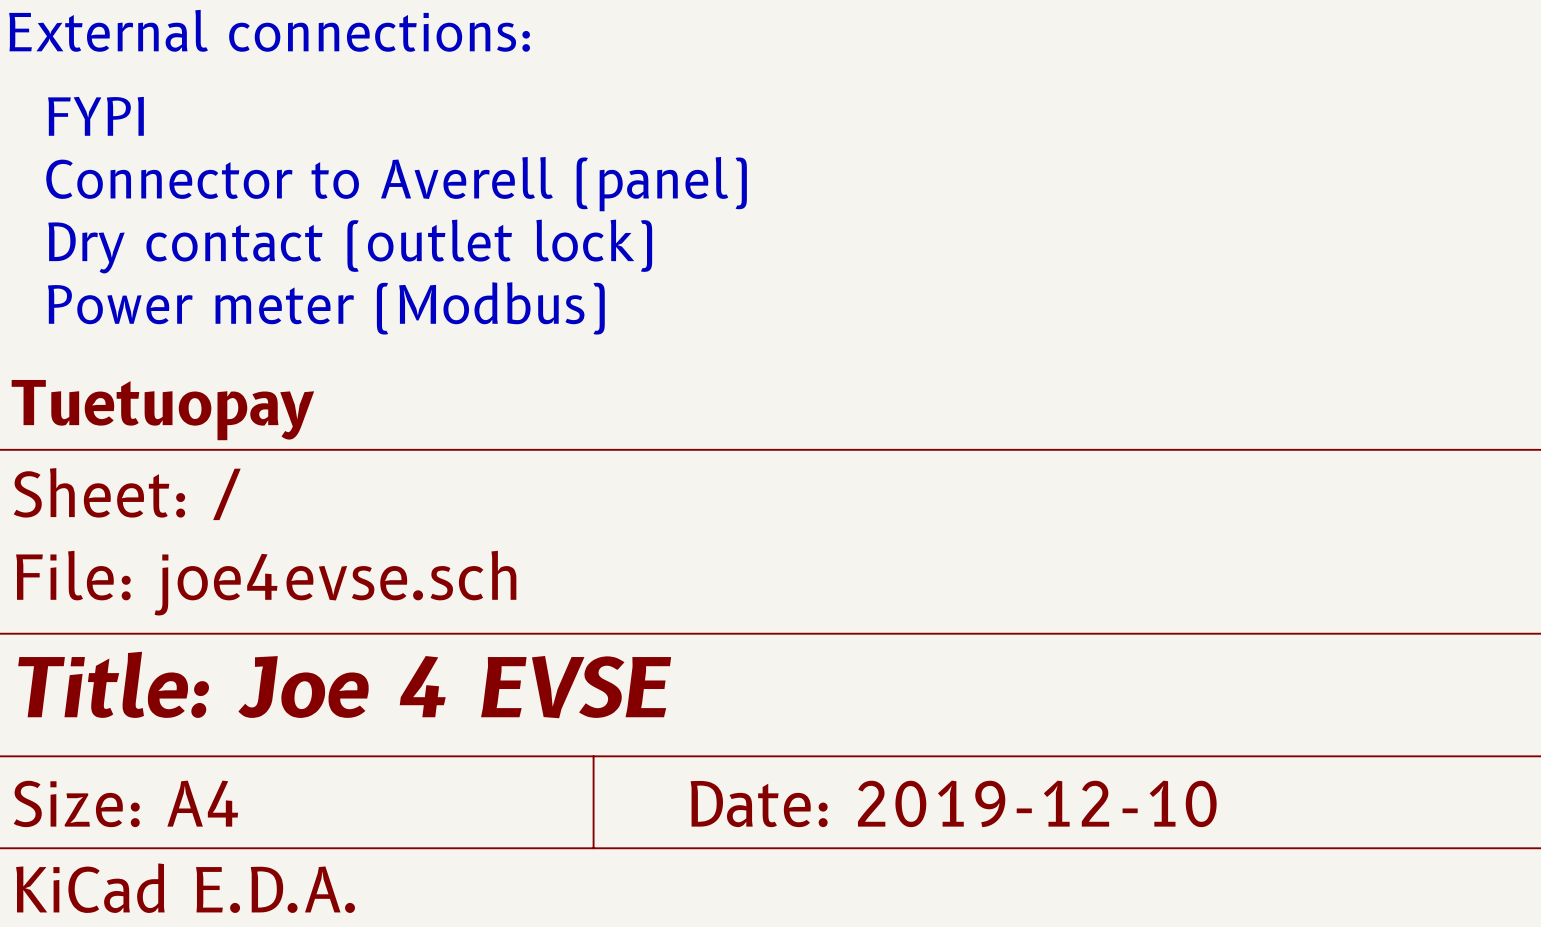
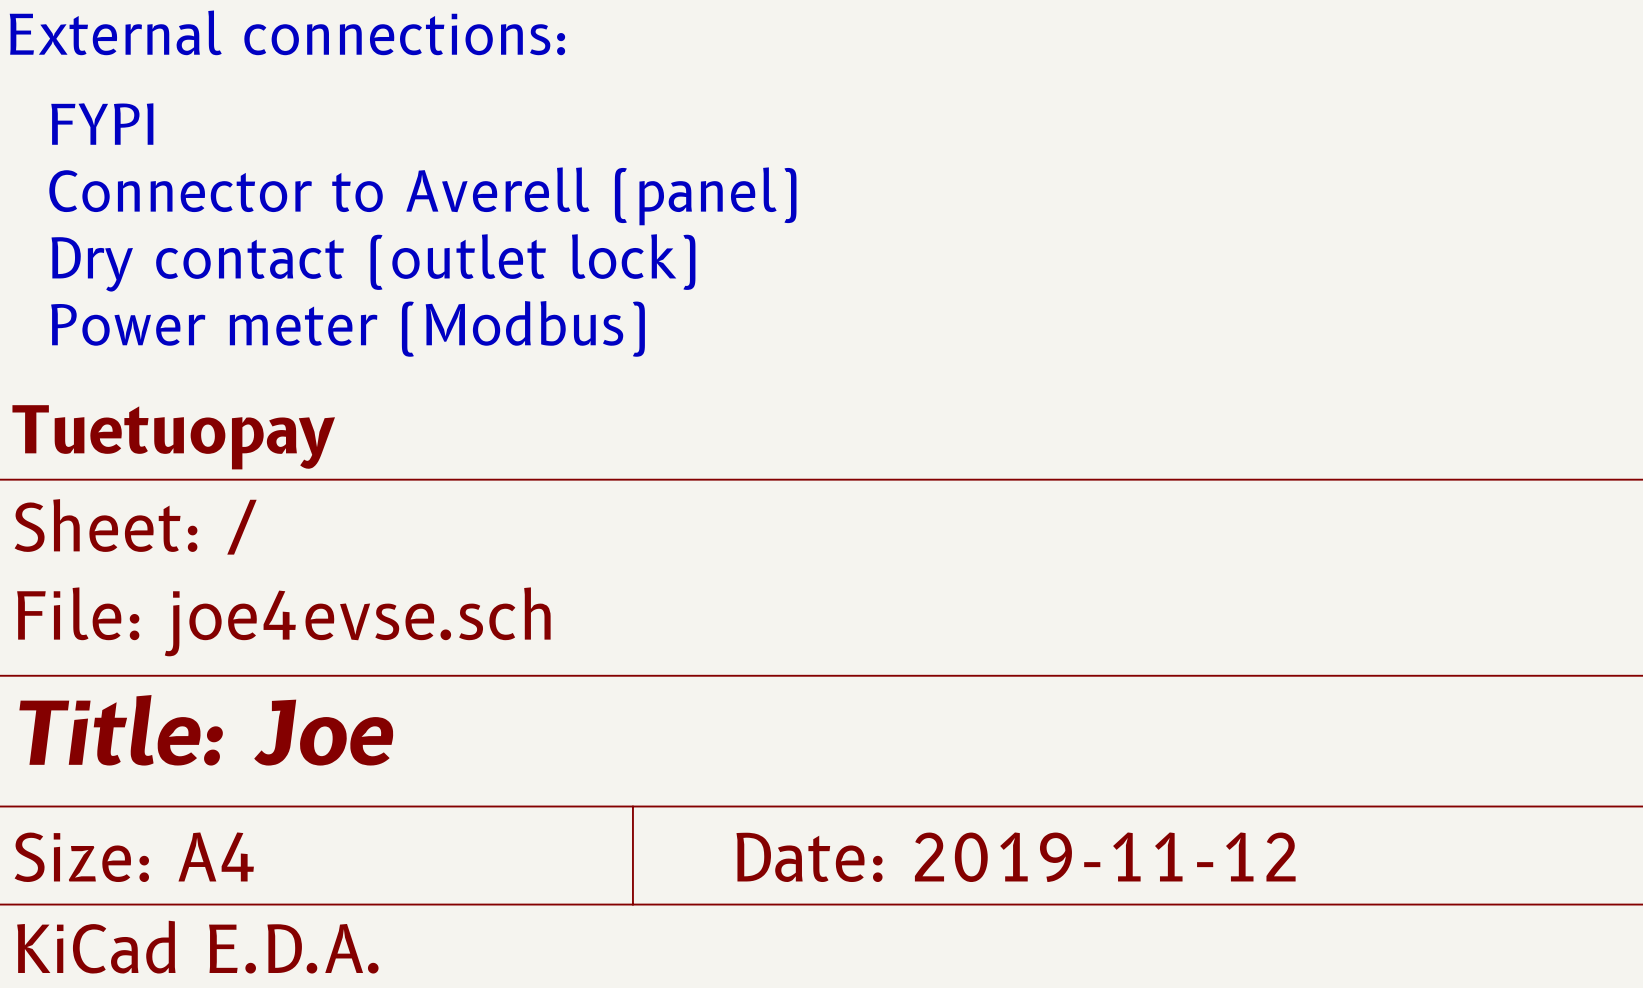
title block: Title: Joe 4 EVSE (344, 685) -> Title: Joe (206, 730)
title block: Date: 2019-12-10 (953, 803) -> Date: 2019-11-12 (1016, 857)

